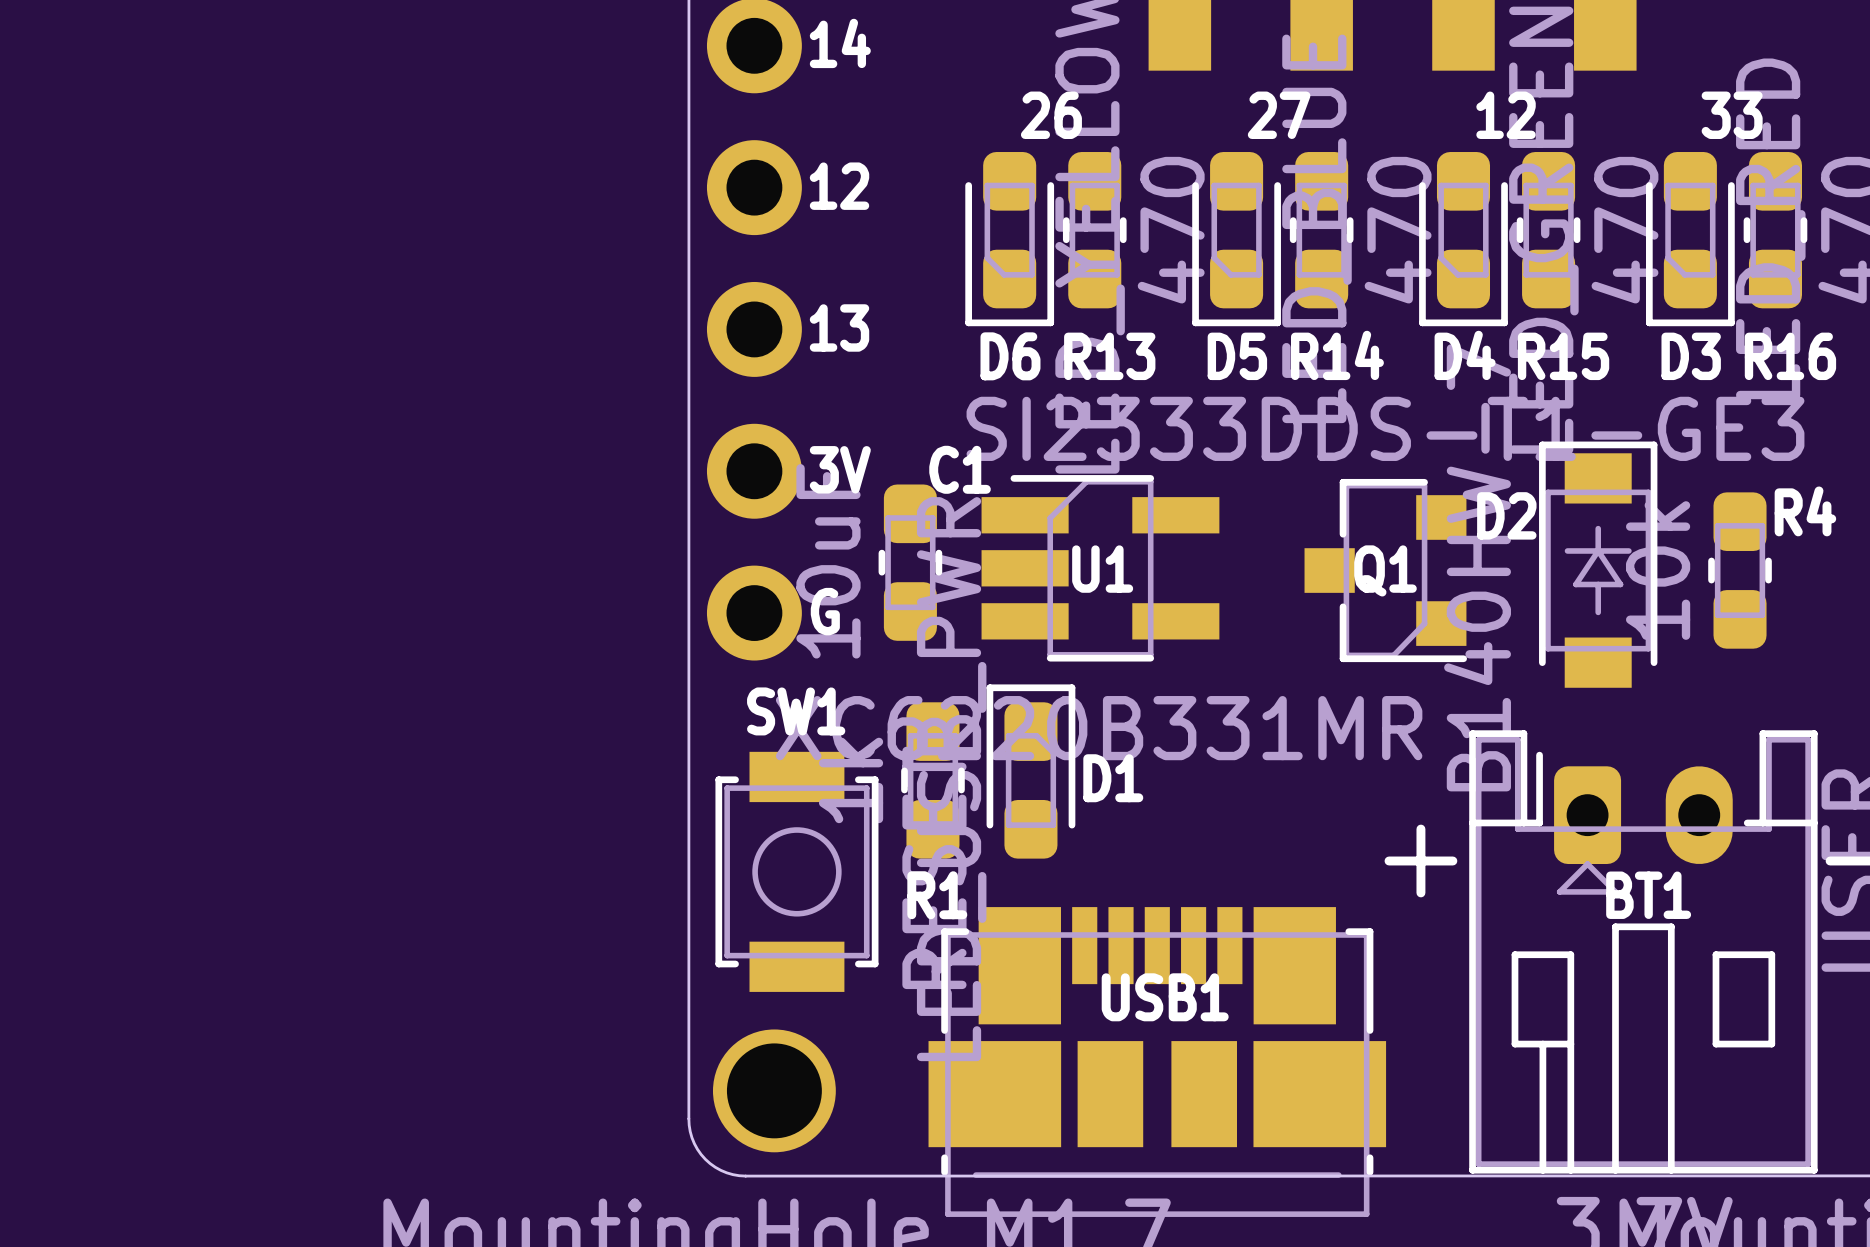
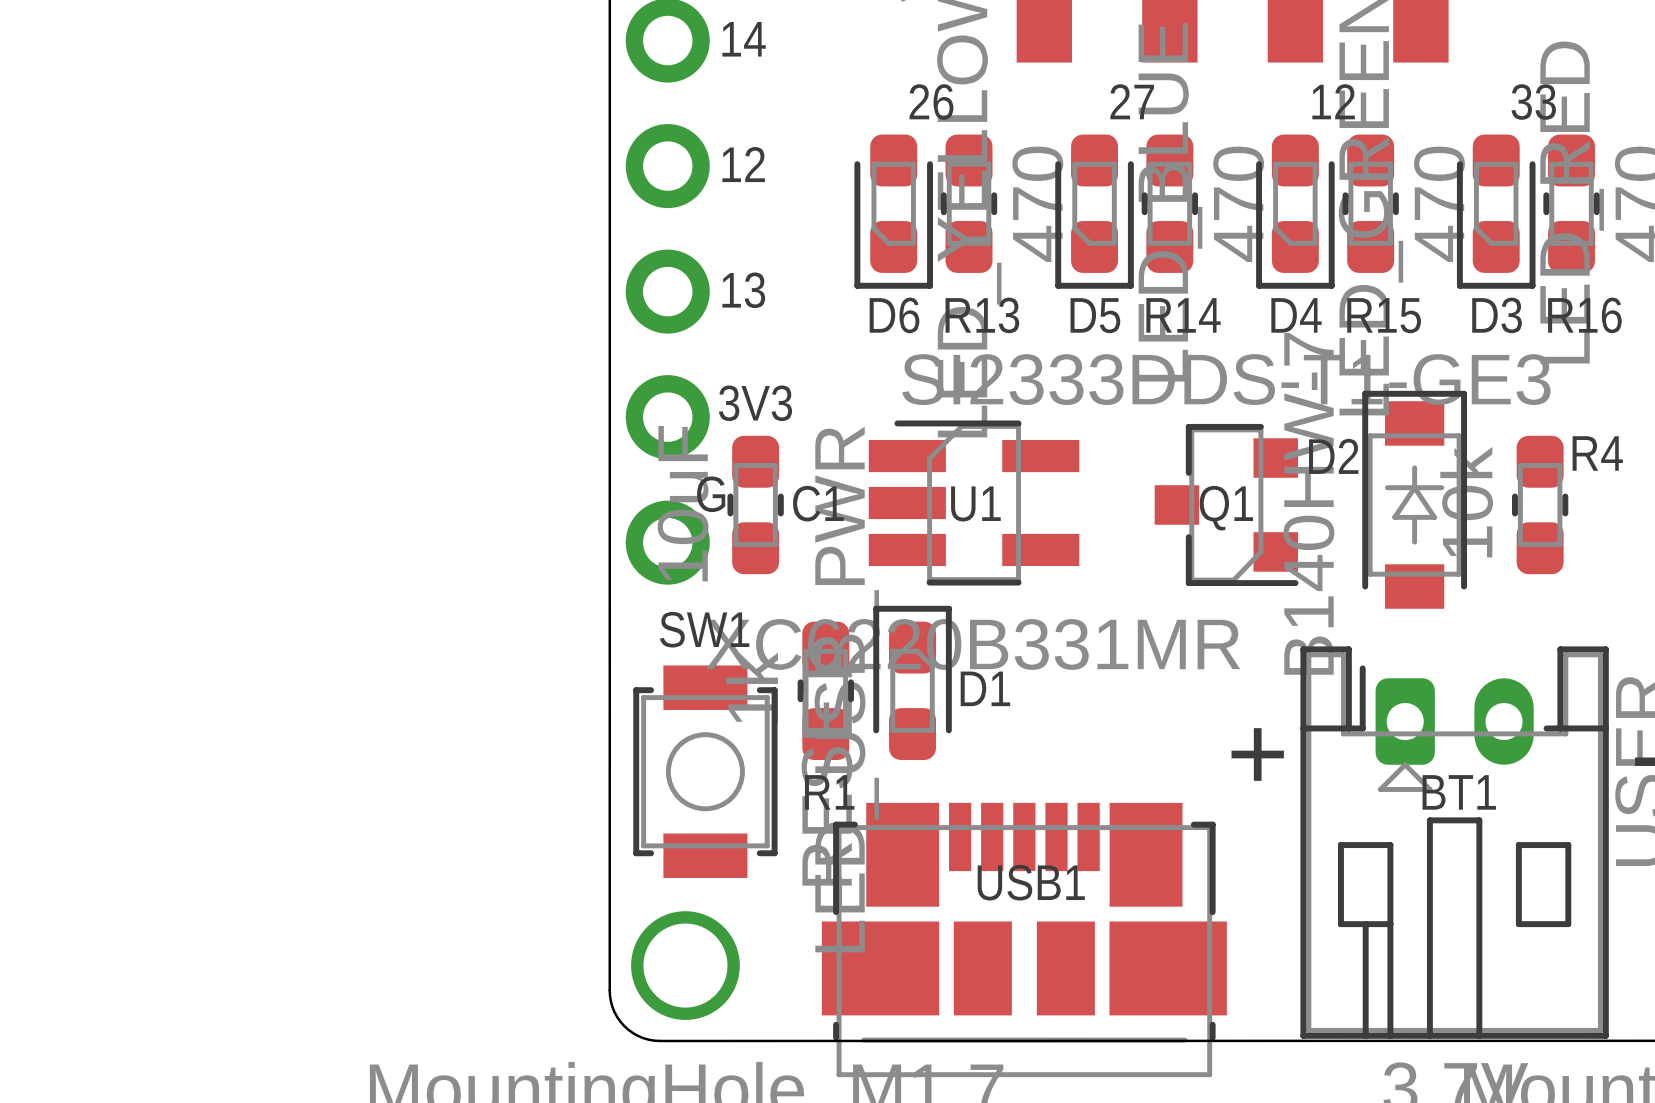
text: 3V (840, 469) -> 3V3 (755, 403)
C1 name position: C1 (960, 469) -> C1 (818, 503)
C1 position: (910, 562) -> (755, 504)
text position: G (825, 611) -> G (711, 494)

